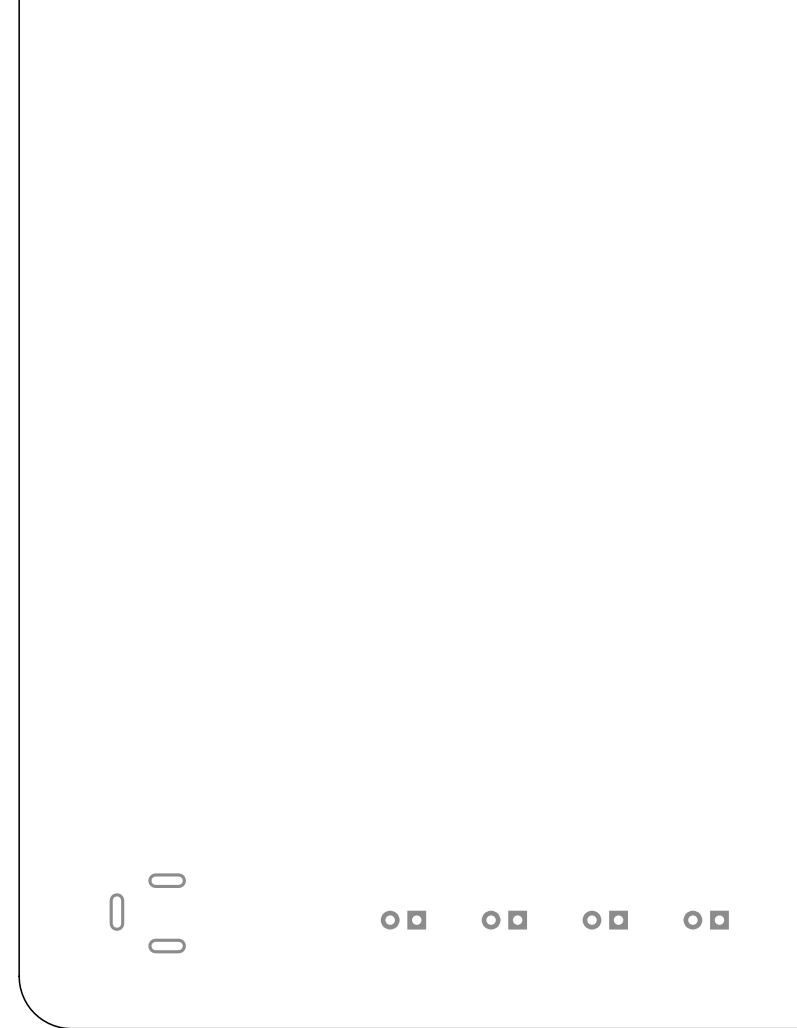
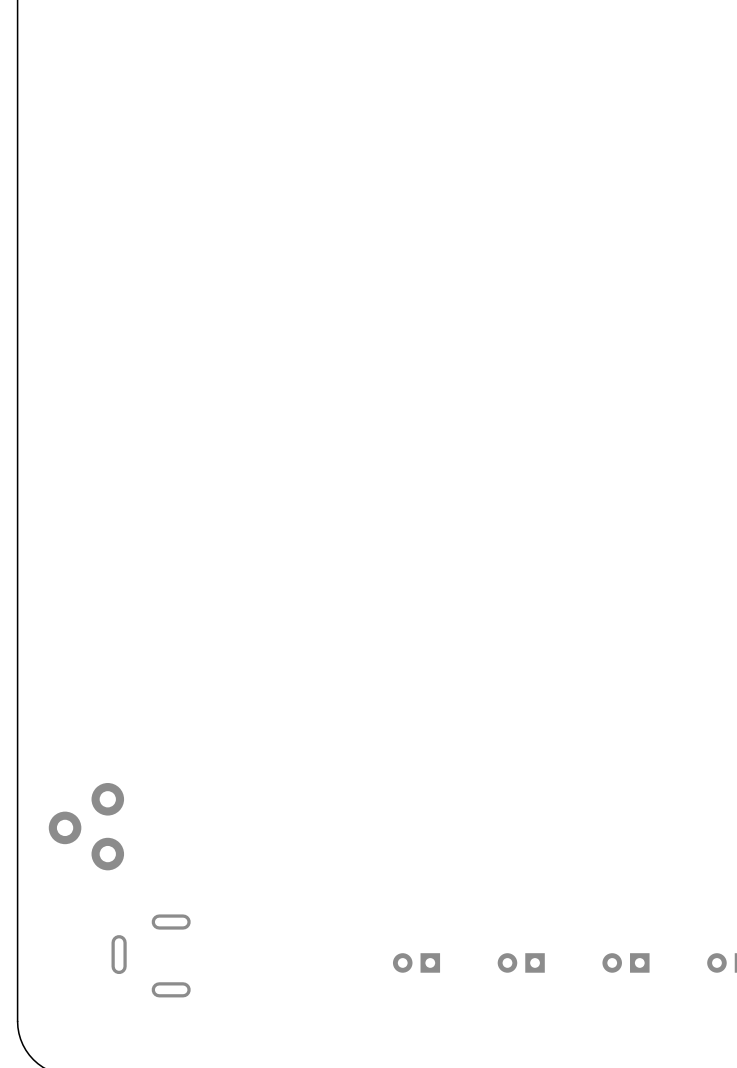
part: none -> (107, 799)
part: none -> (65, 827)
part: none -> (107, 854)

